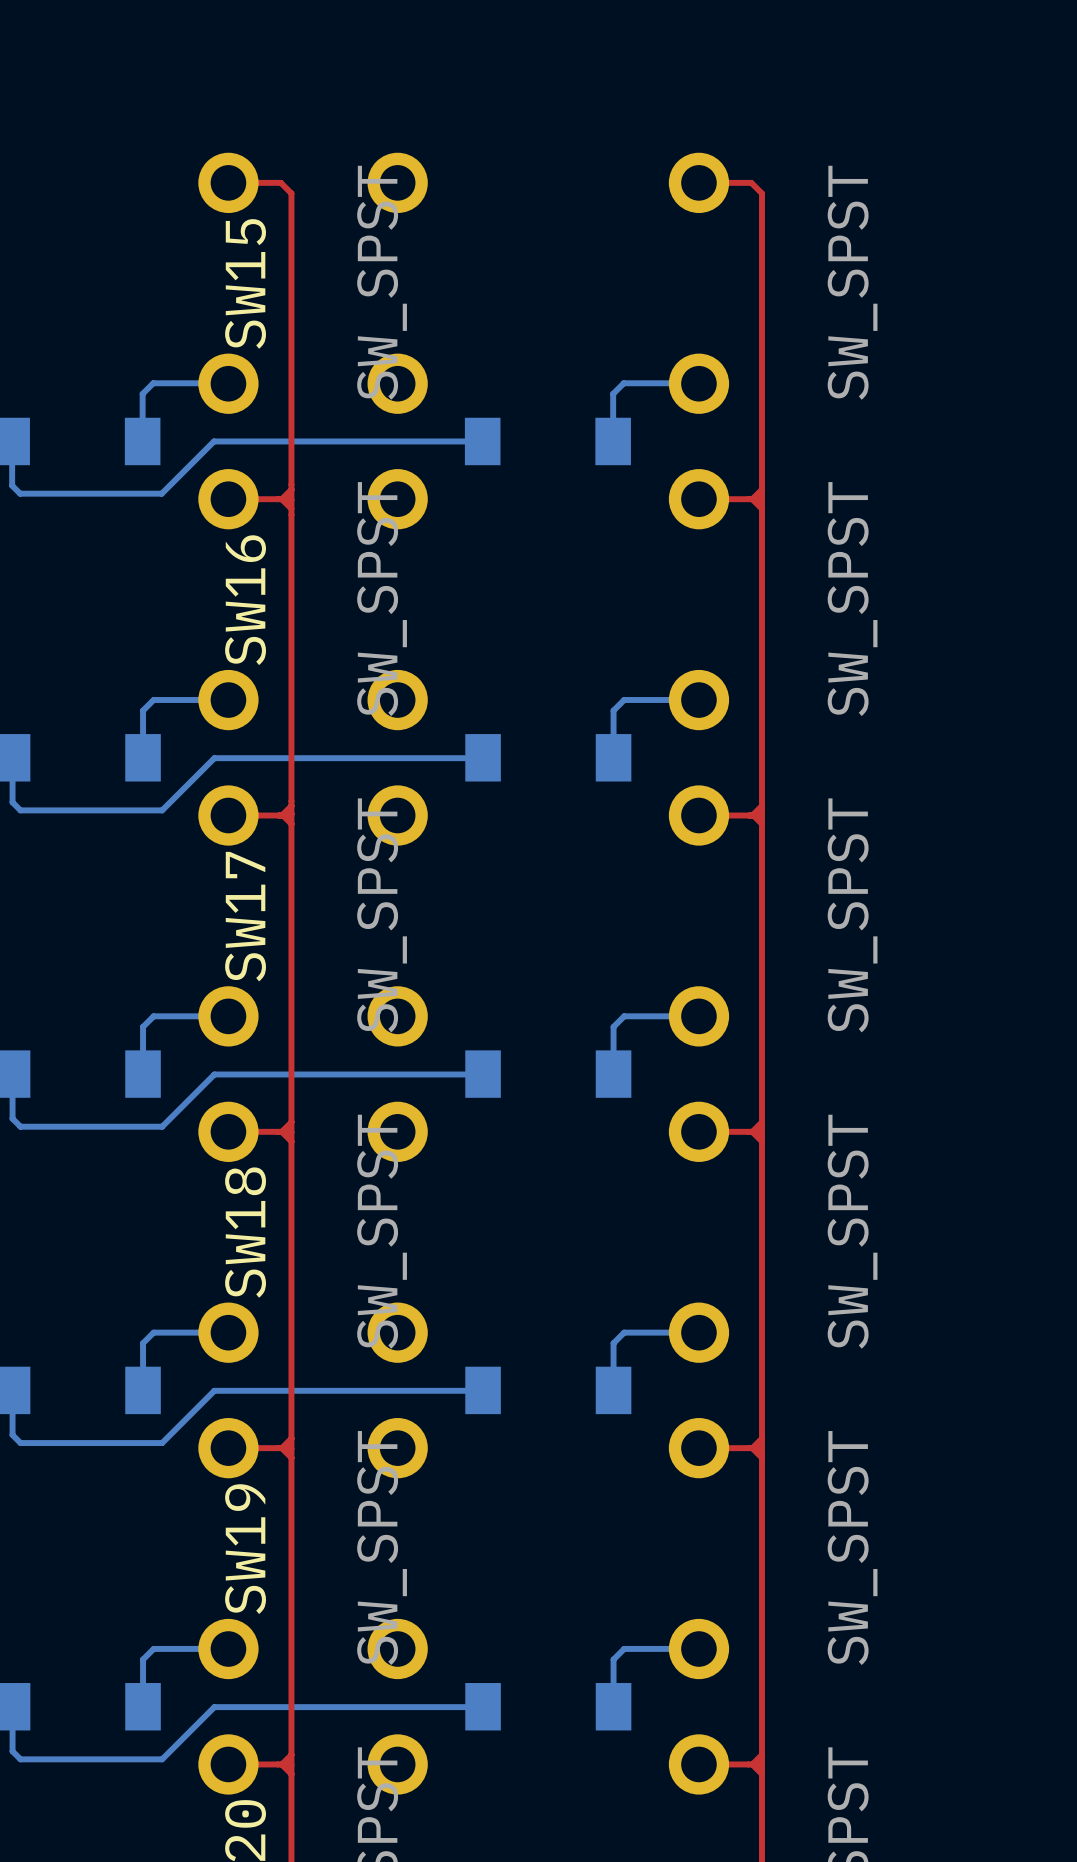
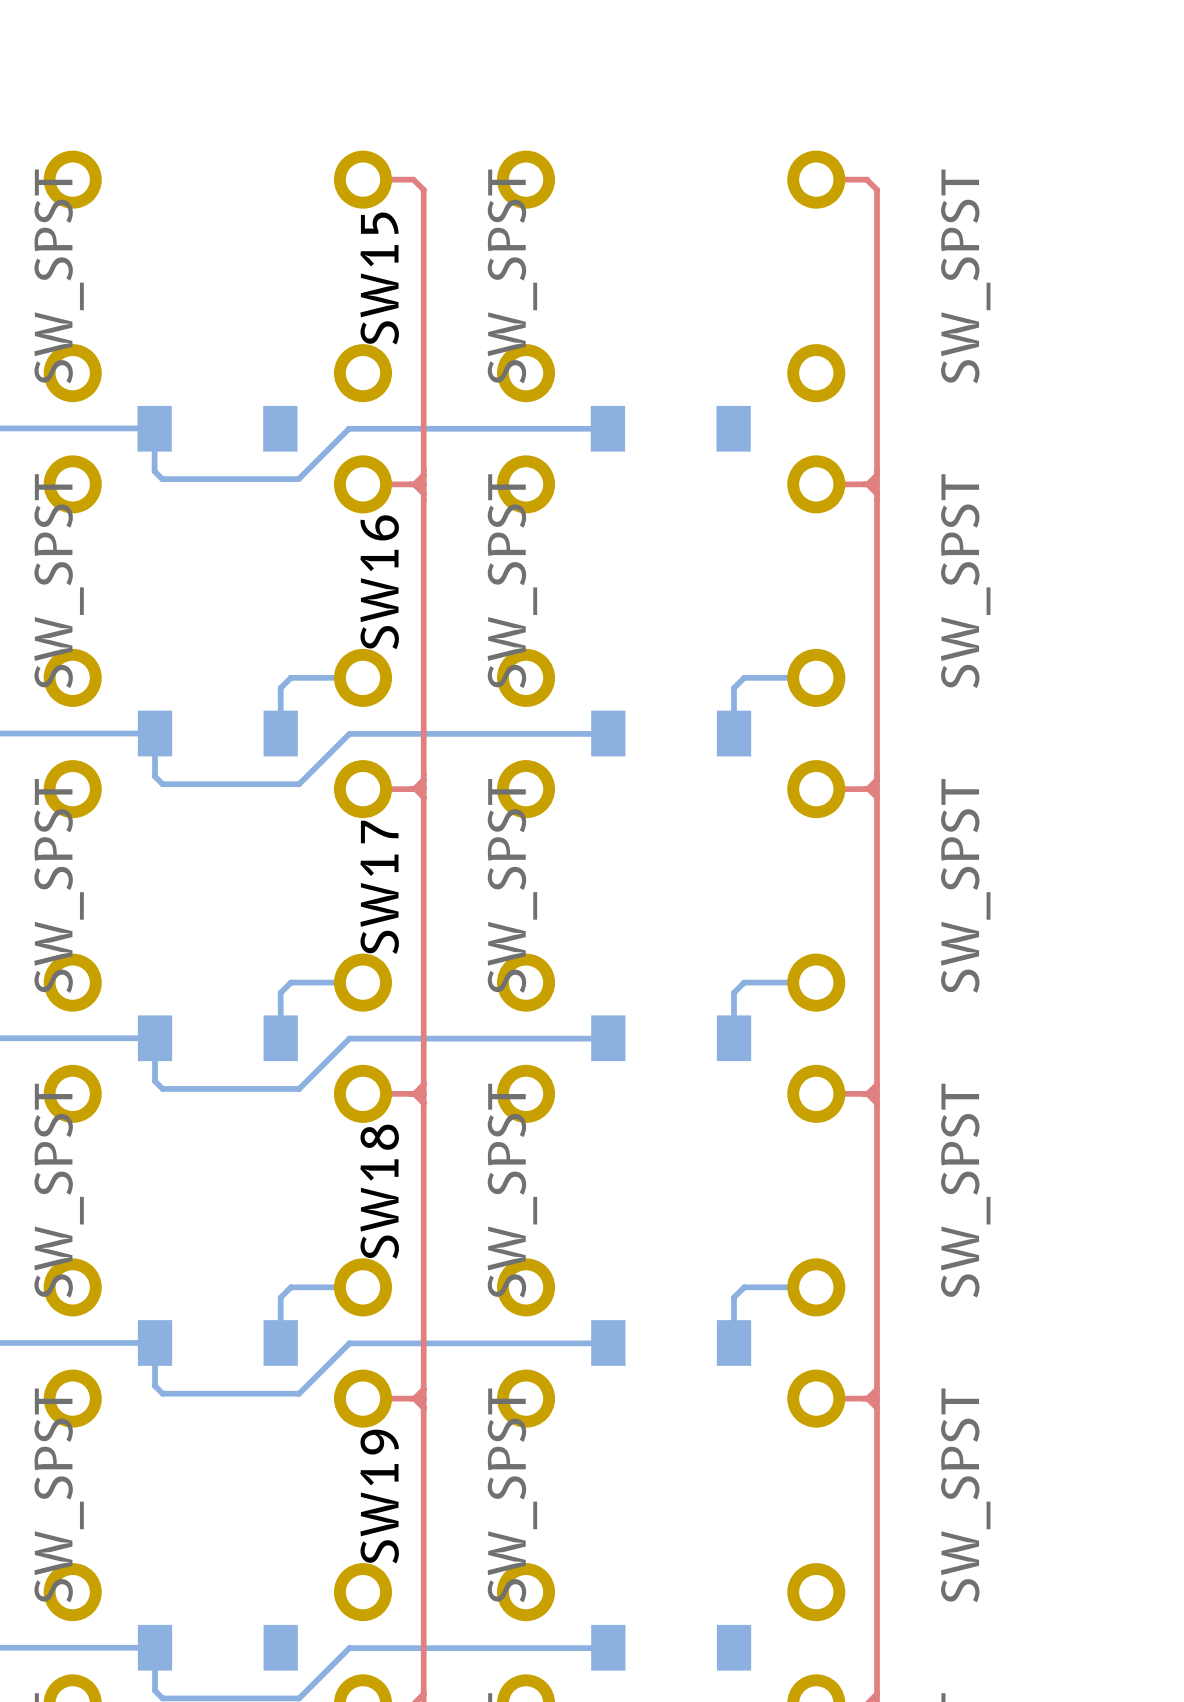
bottom track: (231, 383) (153, 383) (142, 393) (142, 441) -> none
bottom track: (701, 383) (623, 383) (613, 393) (613, 441) -> none
bottom track: (231, 1648) (153, 1648) (143, 1659) (143, 1706) -> none
bottom track: (702, 1648) (624, 1648) (613, 1659) (613, 1706) -> none

